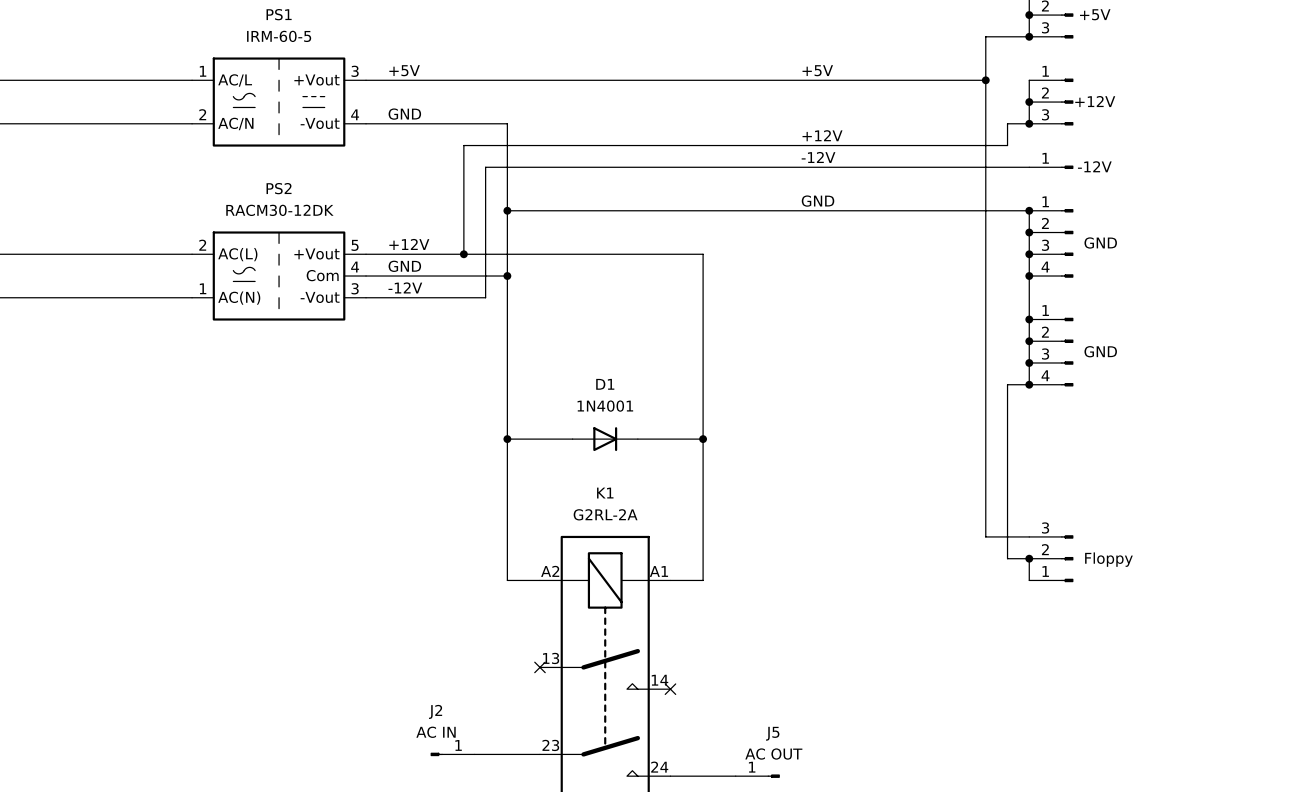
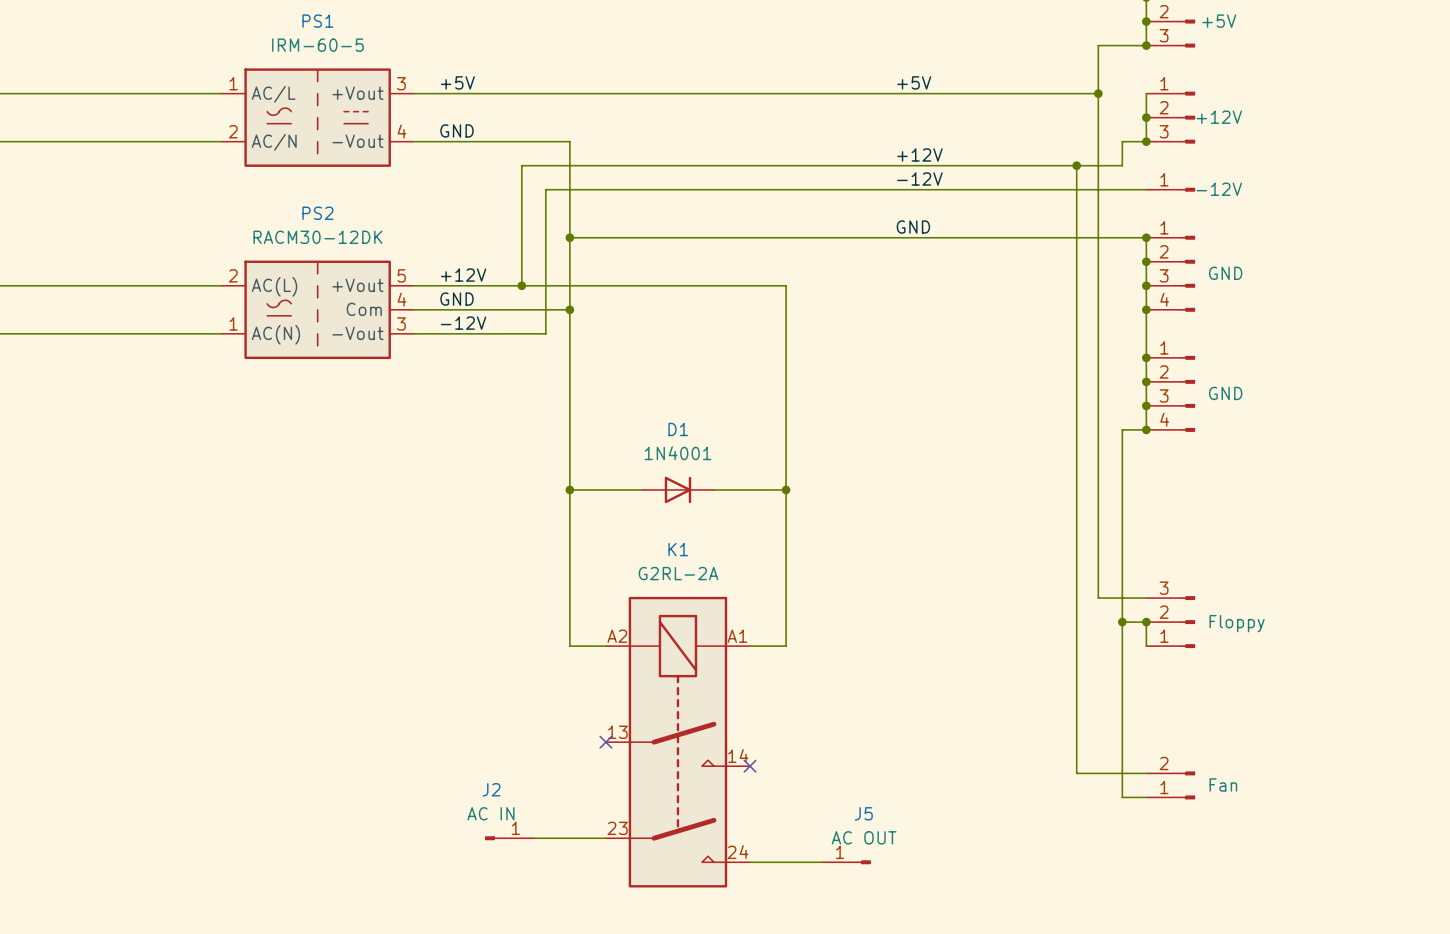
wire: none -> (1076, 165) (1076, 773) (1146, 773)
junction: none -> (1076, 165)
wire: none -> (1122, 622) (1122, 797) (1146, 797)
junction: none -> (1122, 622)
part: none -> Fan (1170, 785)

